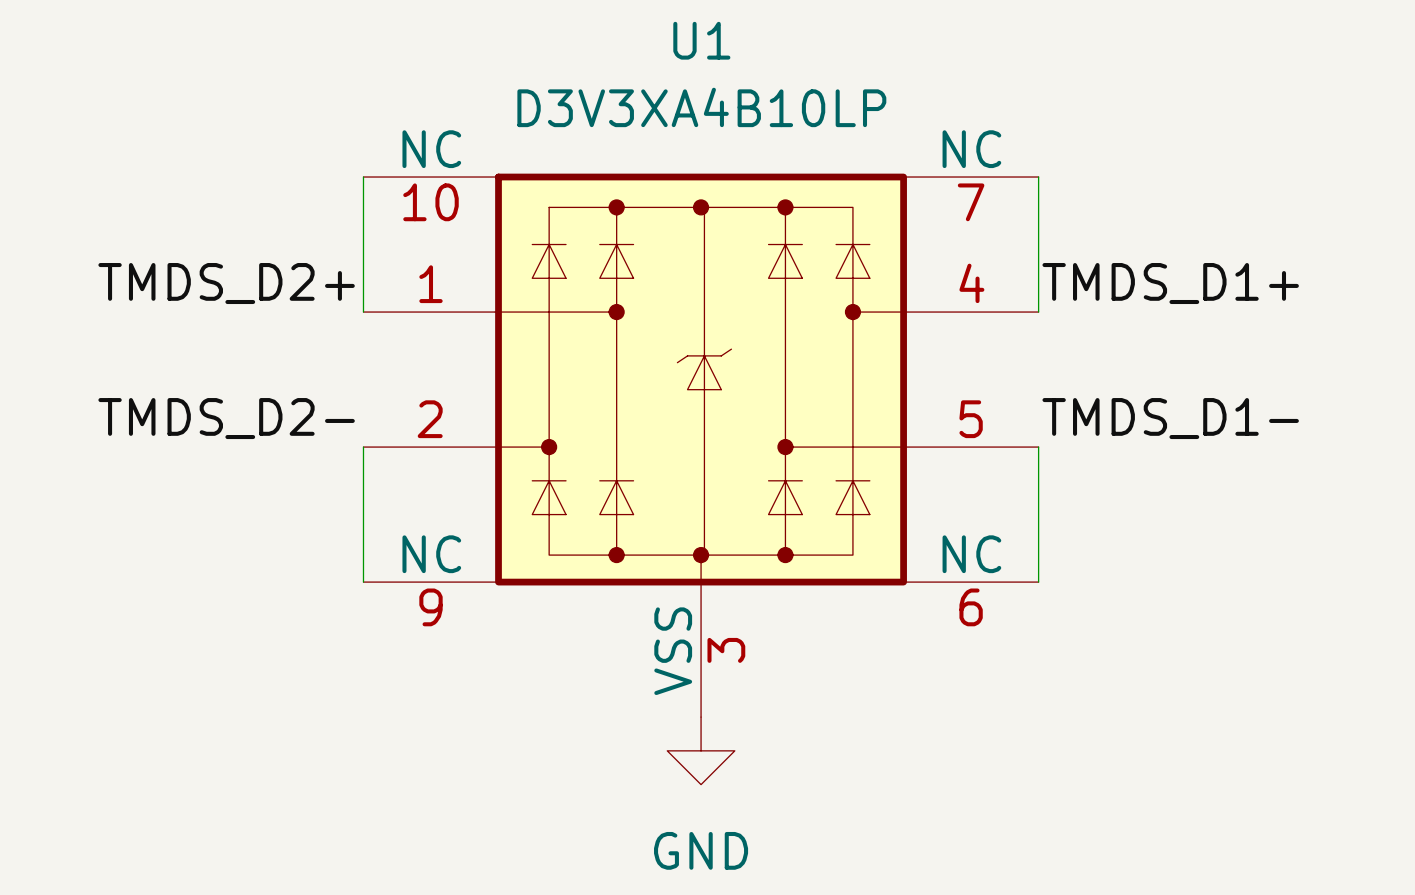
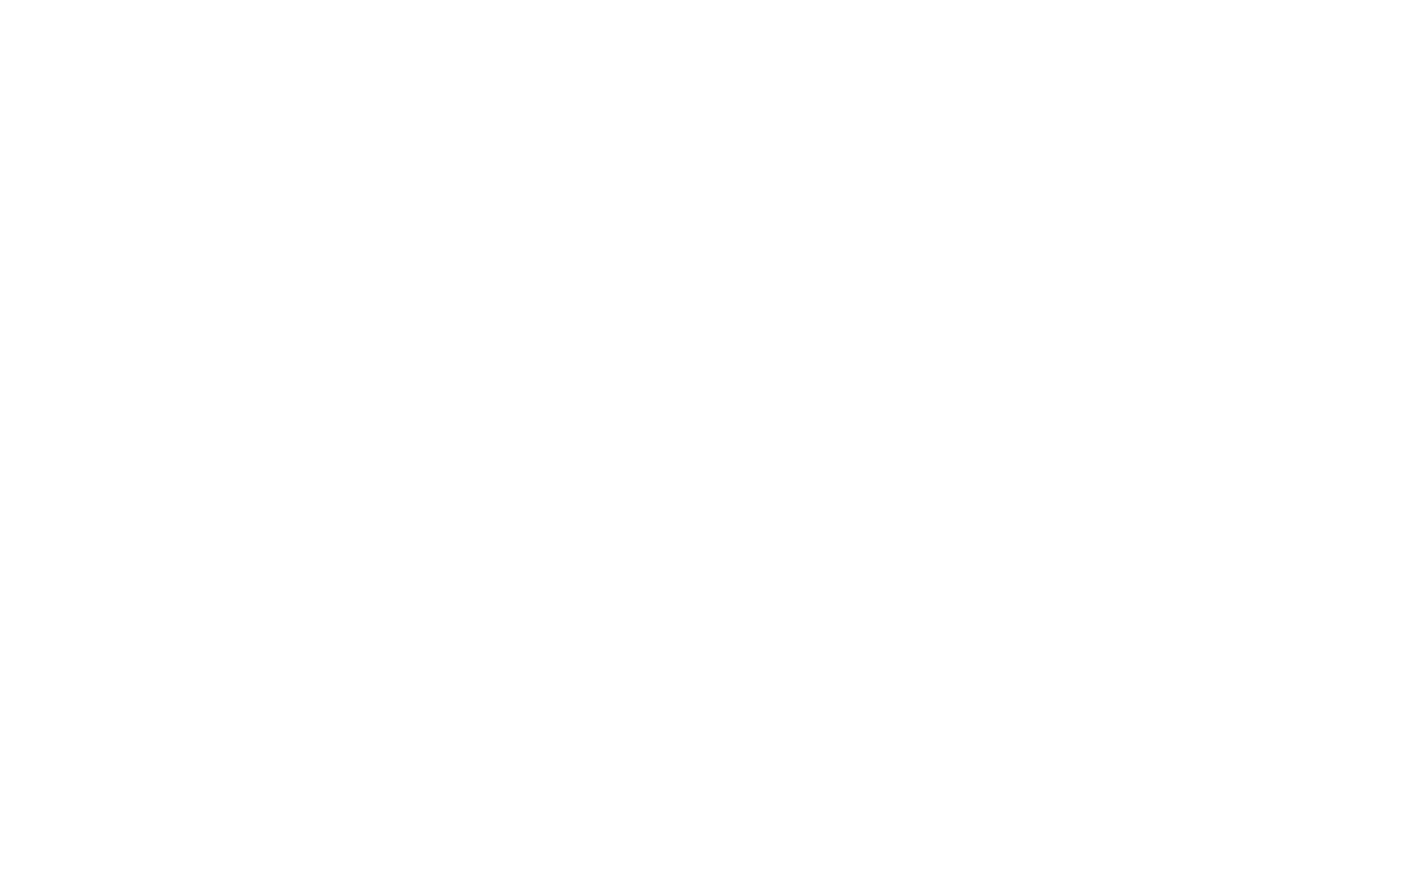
wire: (363, 177) (363, 312) -> none
wire: (1038, 177) (1038, 312) -> none
label: TMDS_D2+ (226, 283) -> none
label: TMDS_D1+ (1170, 283) -> none
label: TMDS_D2- (226, 418) -> none
label: TMDS_D1- (1170, 418) -> none
U1: D3V3XA4B10LP (701, 445) -> none
wire: (363, 447) (363, 582) -> none
wire: (1038, 447) (1038, 582) -> none
power symbol: GND (701, 750) -> none

